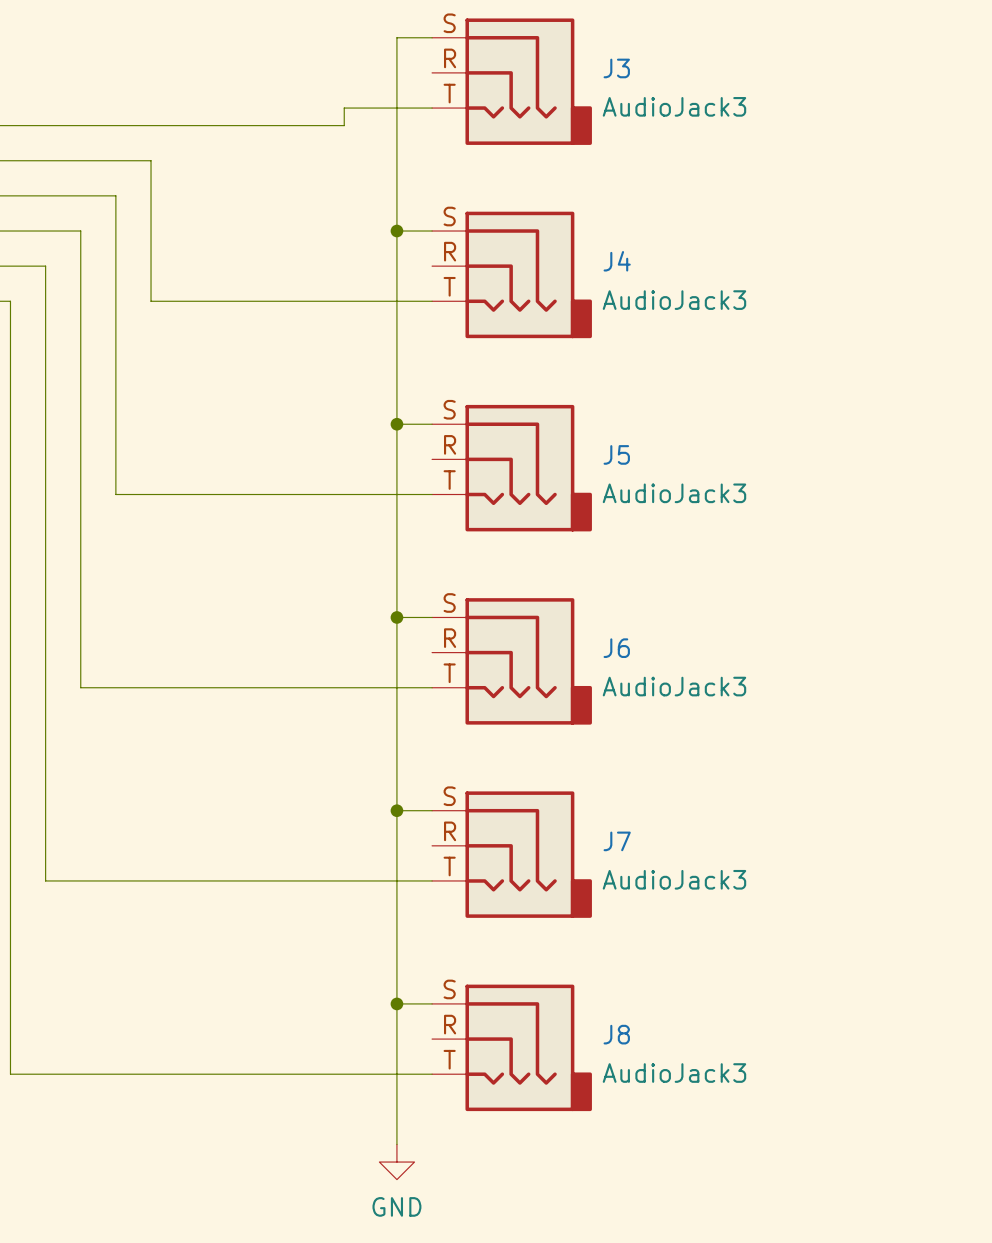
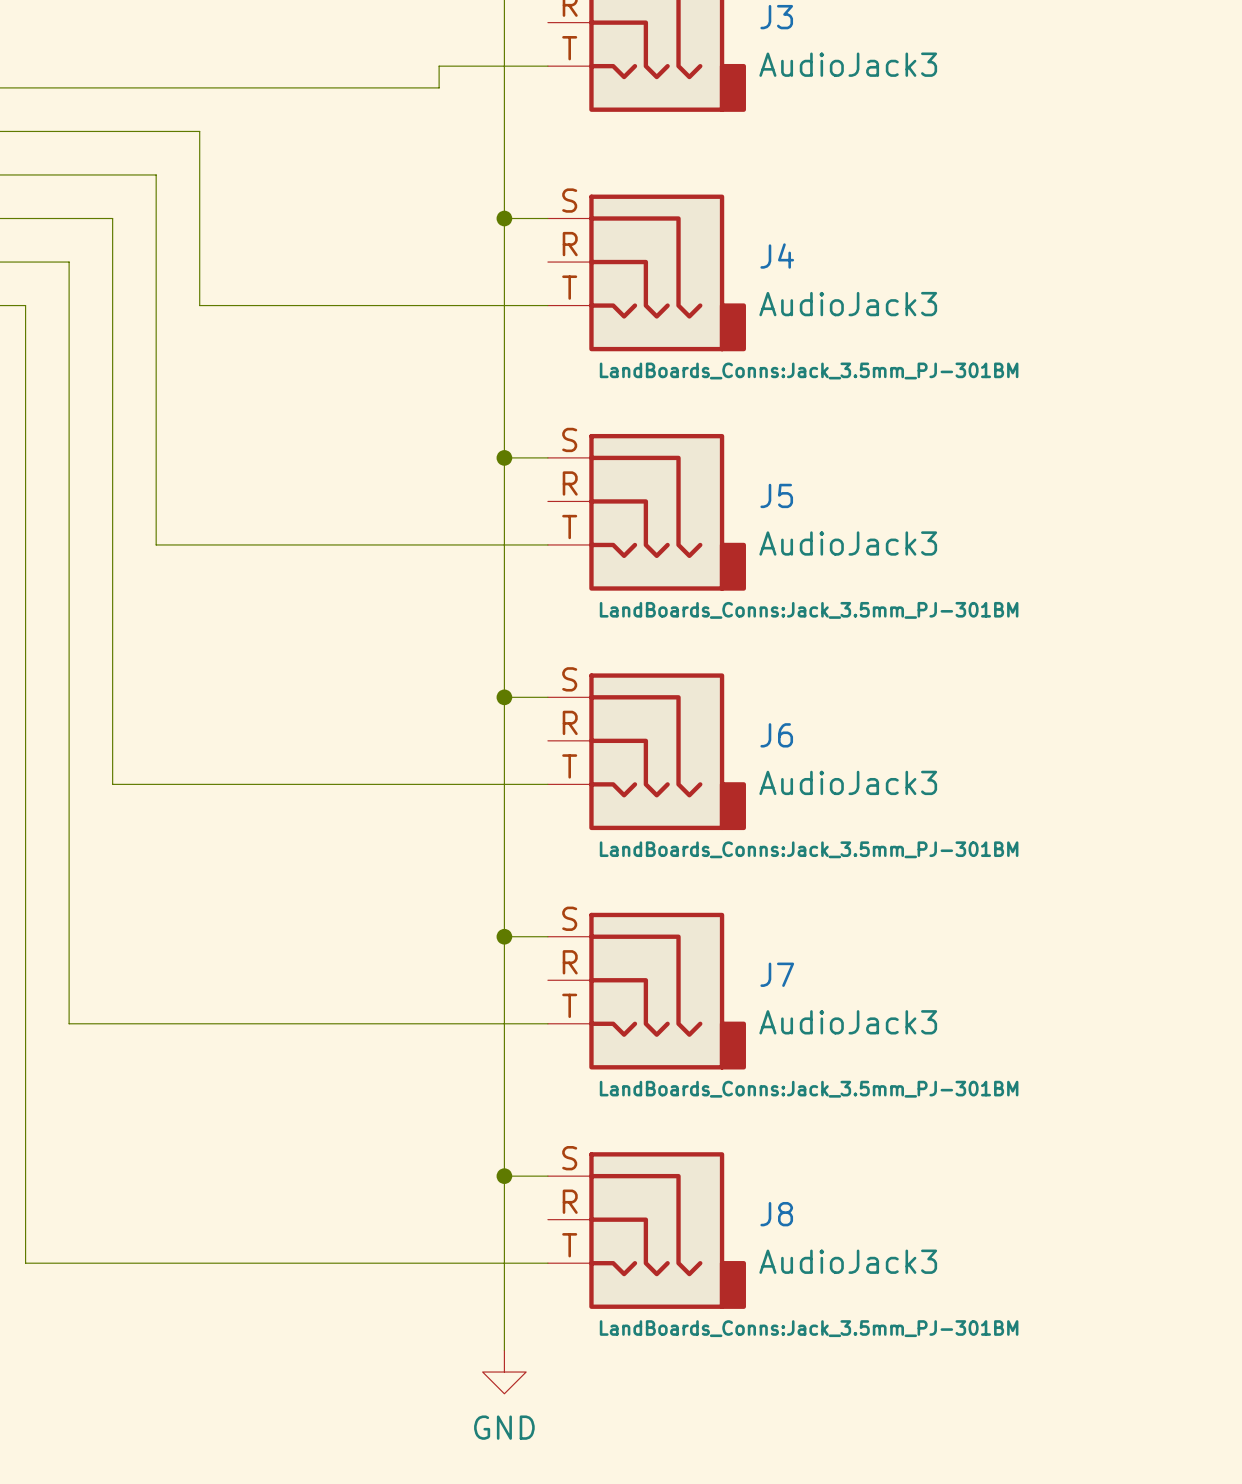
J4 text: none -> LandBoards_Conns:Jack_3.5mm_PJ-301BM (809, 370)
J5 text: none -> LandBoards_Conns:Jack_3.5mm_PJ-301BM (809, 610)
J6 text: none -> LandBoards_Conns:Jack_3.5mm_PJ-301BM (809, 849)
J7 text: none -> LandBoards_Conns:Jack_3.5mm_PJ-301BM (809, 1089)
J8 text: none -> LandBoards_Conns:Jack_3.5mm_PJ-301BM (809, 1328)

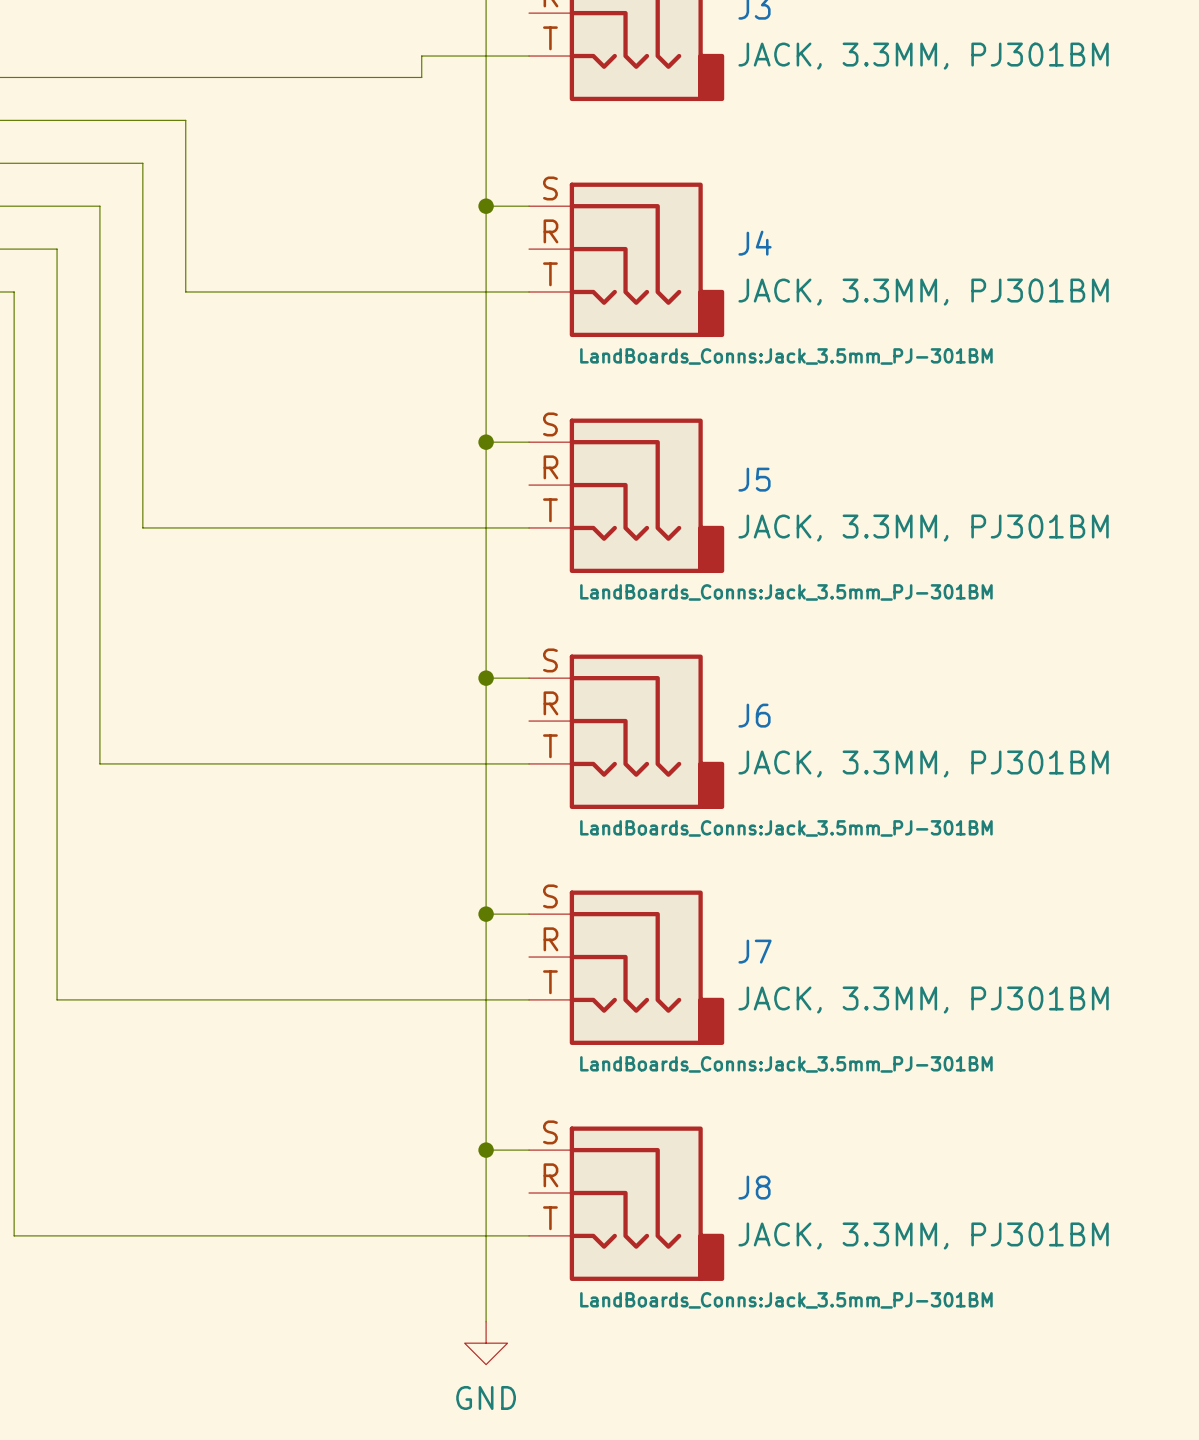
J3 value: AudioJack3 (848, 64) -> JACK, 3.3MM, PJ301BM (923, 56)
J4 value: AudioJack3 (848, 304) -> JACK, 3.3MM, PJ301BM (923, 292)
J5 value: AudioJack3 (848, 543) -> JACK, 3.3MM, PJ301BM (923, 528)
J6 value: AudioJack3 (848, 782) -> JACK, 3.3MM, PJ301BM (923, 764)
J7 value: AudioJack3 (848, 1022) -> JACK, 3.3MM, PJ301BM (923, 1000)
J8 value: AudioJack3 (848, 1261) -> JACK, 3.3MM, PJ301BM (923, 1235)

